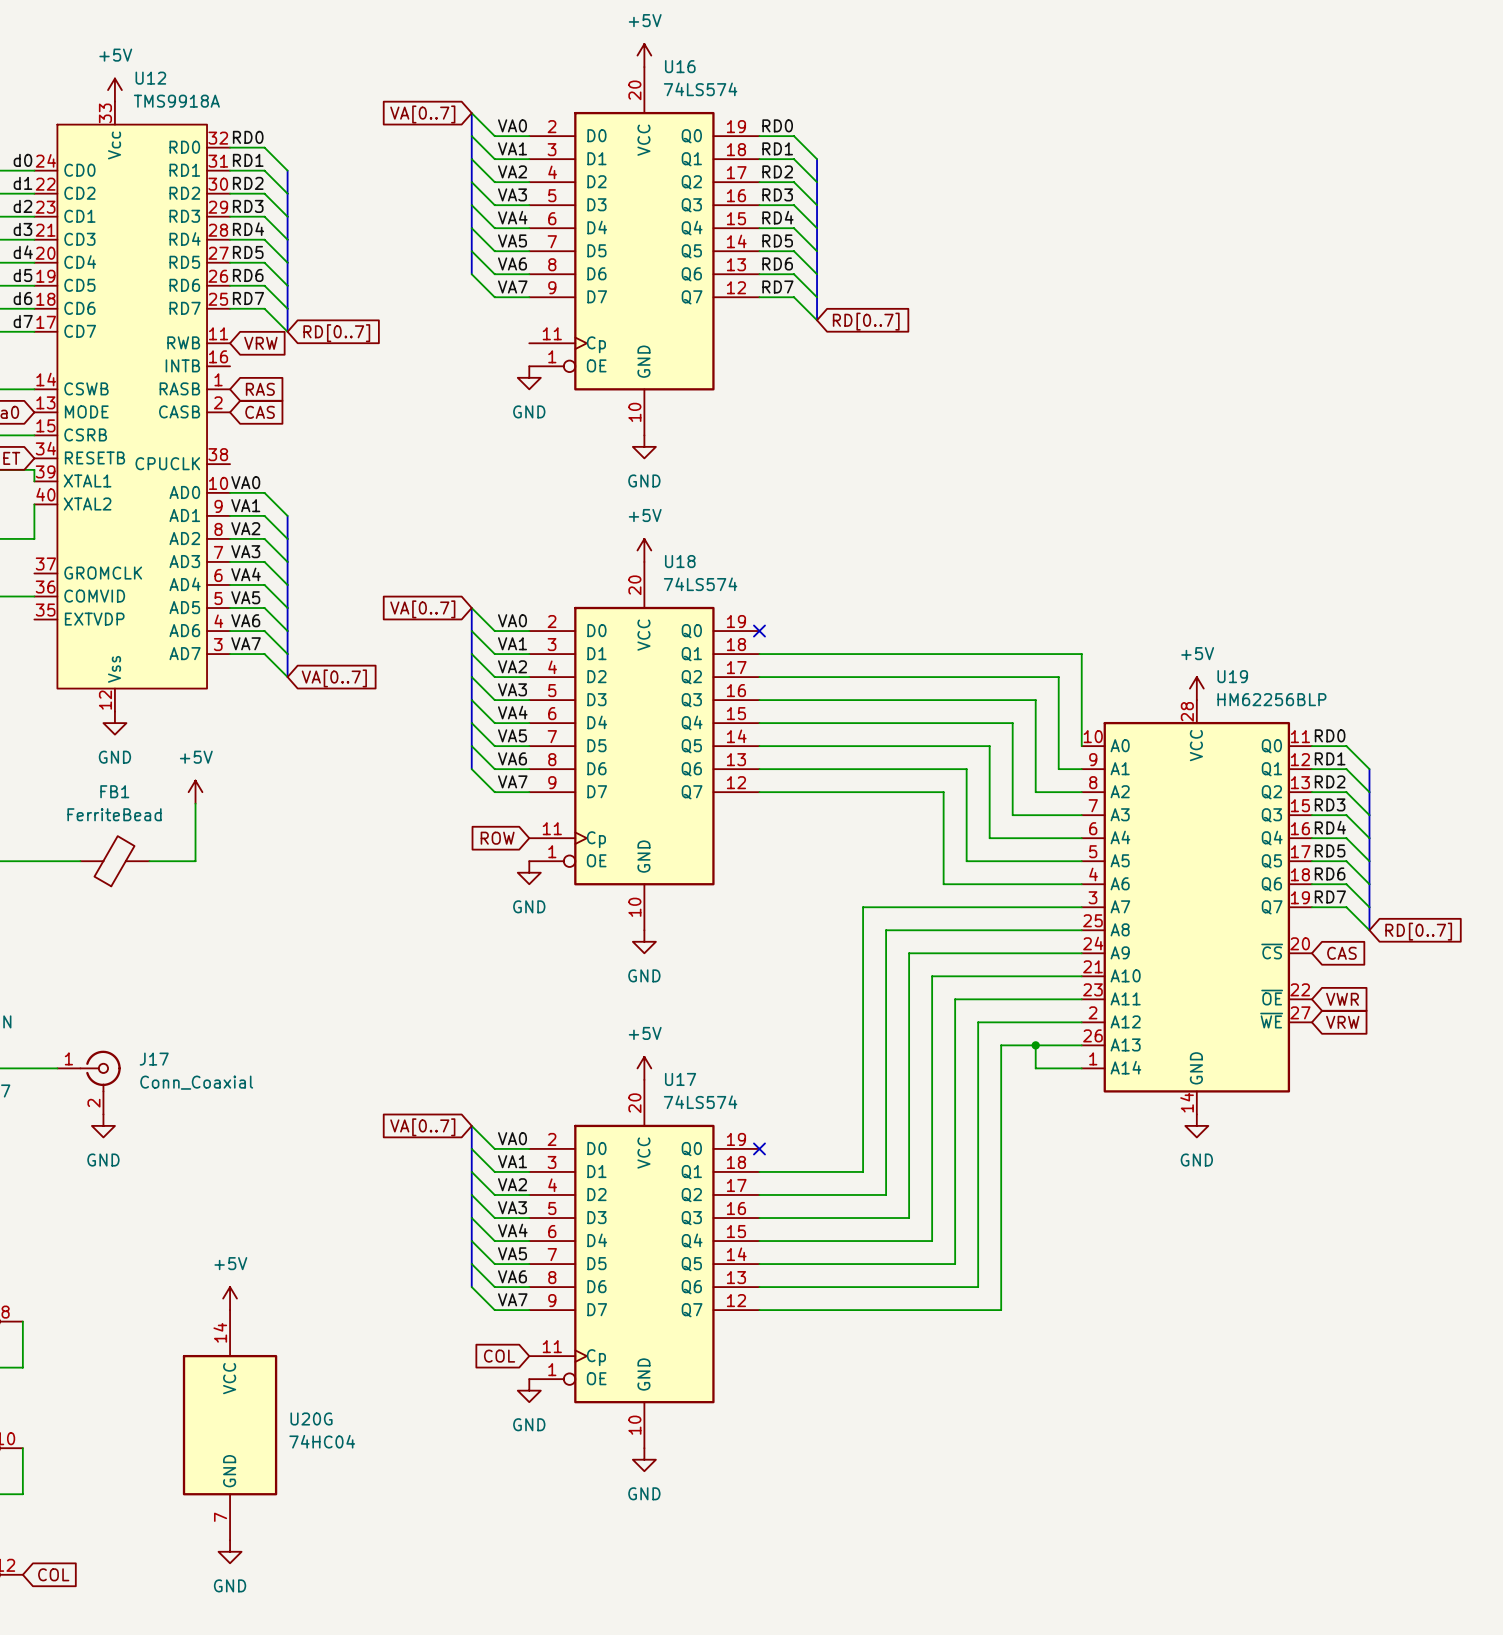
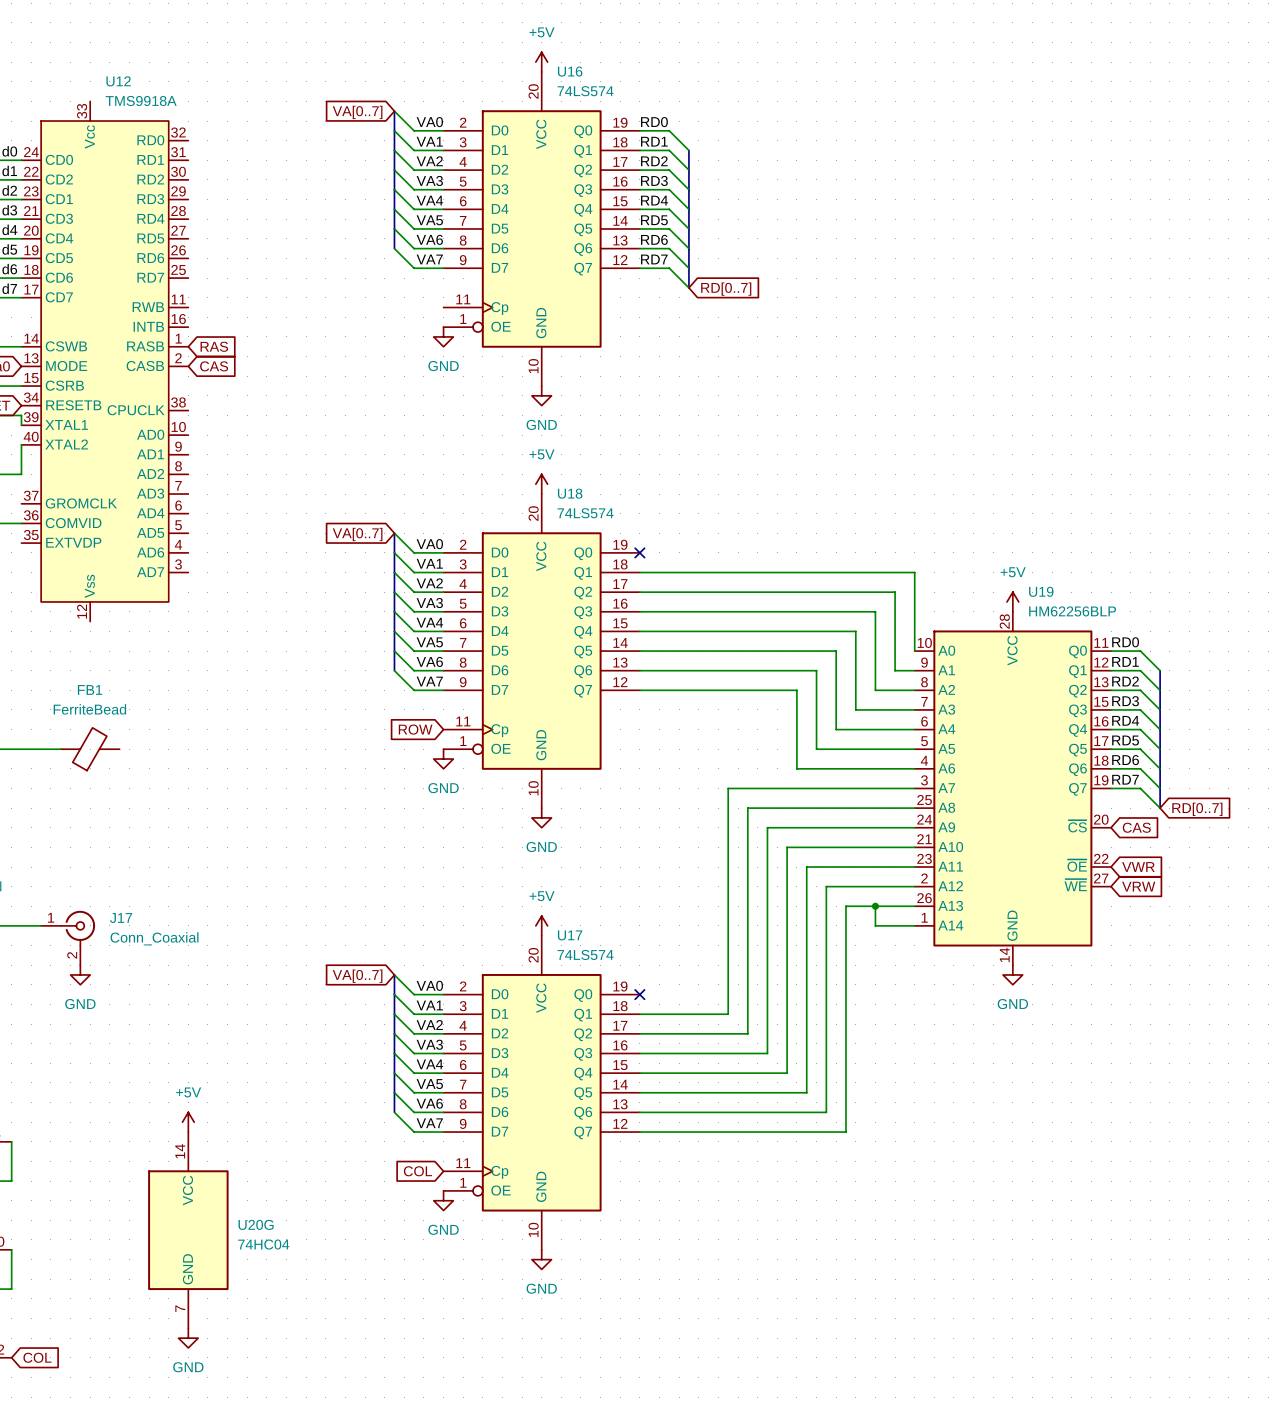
power symbol: +5V (114, 90) -> none
label: RD0 (248, 137) -> none
wire: (230, 147) (264, 147) (287, 170) -> none
label: RD1 (248, 160) -> none
wire: (230, 170) (264, 170) (287, 193) -> none
bus: (287, 170) (287, 331) -> none
label: RD2 (248, 183) -> none
wire: (230, 193) (264, 193) (287, 216) -> none
label: RD3 (248, 206) -> none
wire: (230, 216) (264, 216) (287, 239) -> none
label: RD4 (248, 229) -> none
wire: (230, 239) (264, 239) (287, 262) -> none
label: RD5 (248, 252) -> none
wire: (230, 262) (264, 262) (287, 285) -> none
label: RD6 (248, 275) -> none
wire: (230, 285) (264, 285) (287, 308) -> none
label: RD7 (248, 298) -> none
wire: (230, 308) (264, 308) (287, 331) -> none
global label: RD[0..7] (336, 333) -> none
global label: VRW (260, 343) -> none
label: VA0 (245, 482) -> none
wire: (230, 492) (264, 492) (287, 515) -> none
label: VA1 (245, 505) -> none
wire: (230, 515) (264, 515) (287, 538) -> none
bus: (287, 515) (287, 677) -> none
label: VA2 (245, 528) -> none
wire: (230, 538) (264, 538) (287, 561) -> none
label: VA3 (245, 551) -> none
wire: (230, 561) (264, 561) (287, 584) -> none
label: VA4 (246, 574) -> none
wire: (230, 584) (264, 584) (287, 608) -> none
label: VA5 (245, 597) -> none
wire: (230, 608) (264, 608) (287, 631) -> none
label: VA6 (245, 620) -> none
wire: (230, 631) (264, 631) (287, 654) -> none
label: VA7 (246, 643) -> none
wire: (230, 654) (264, 654) (287, 677) -> none
global label: VA[0..7] (334, 678) -> none
power symbol: GND (114, 723) -> none
power symbol: +5V (195, 792) -> none
wire: (195, 803) (195, 861) (149, 861) -> none

